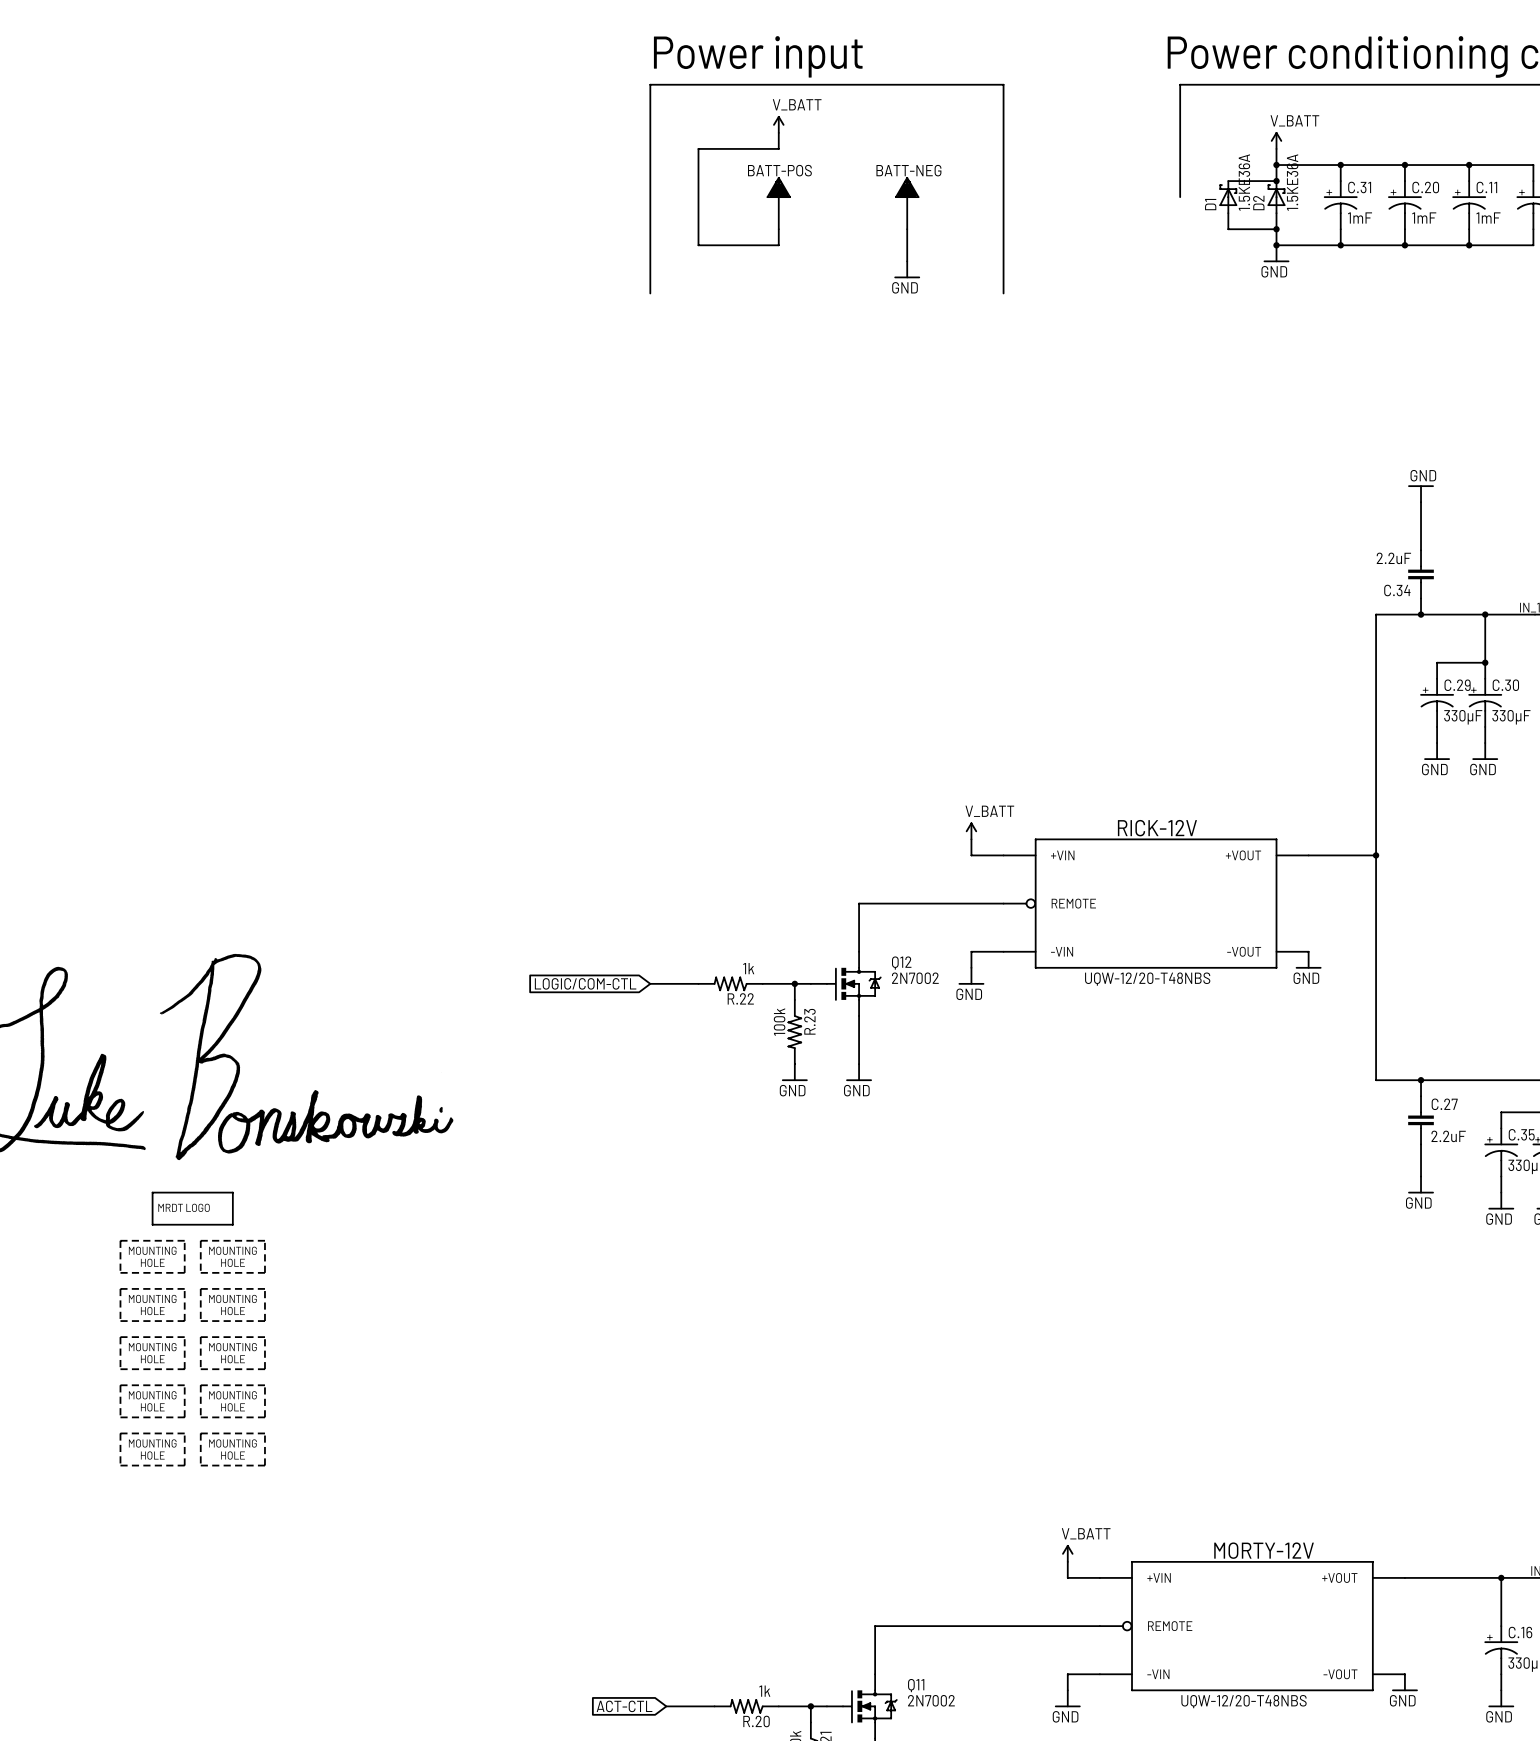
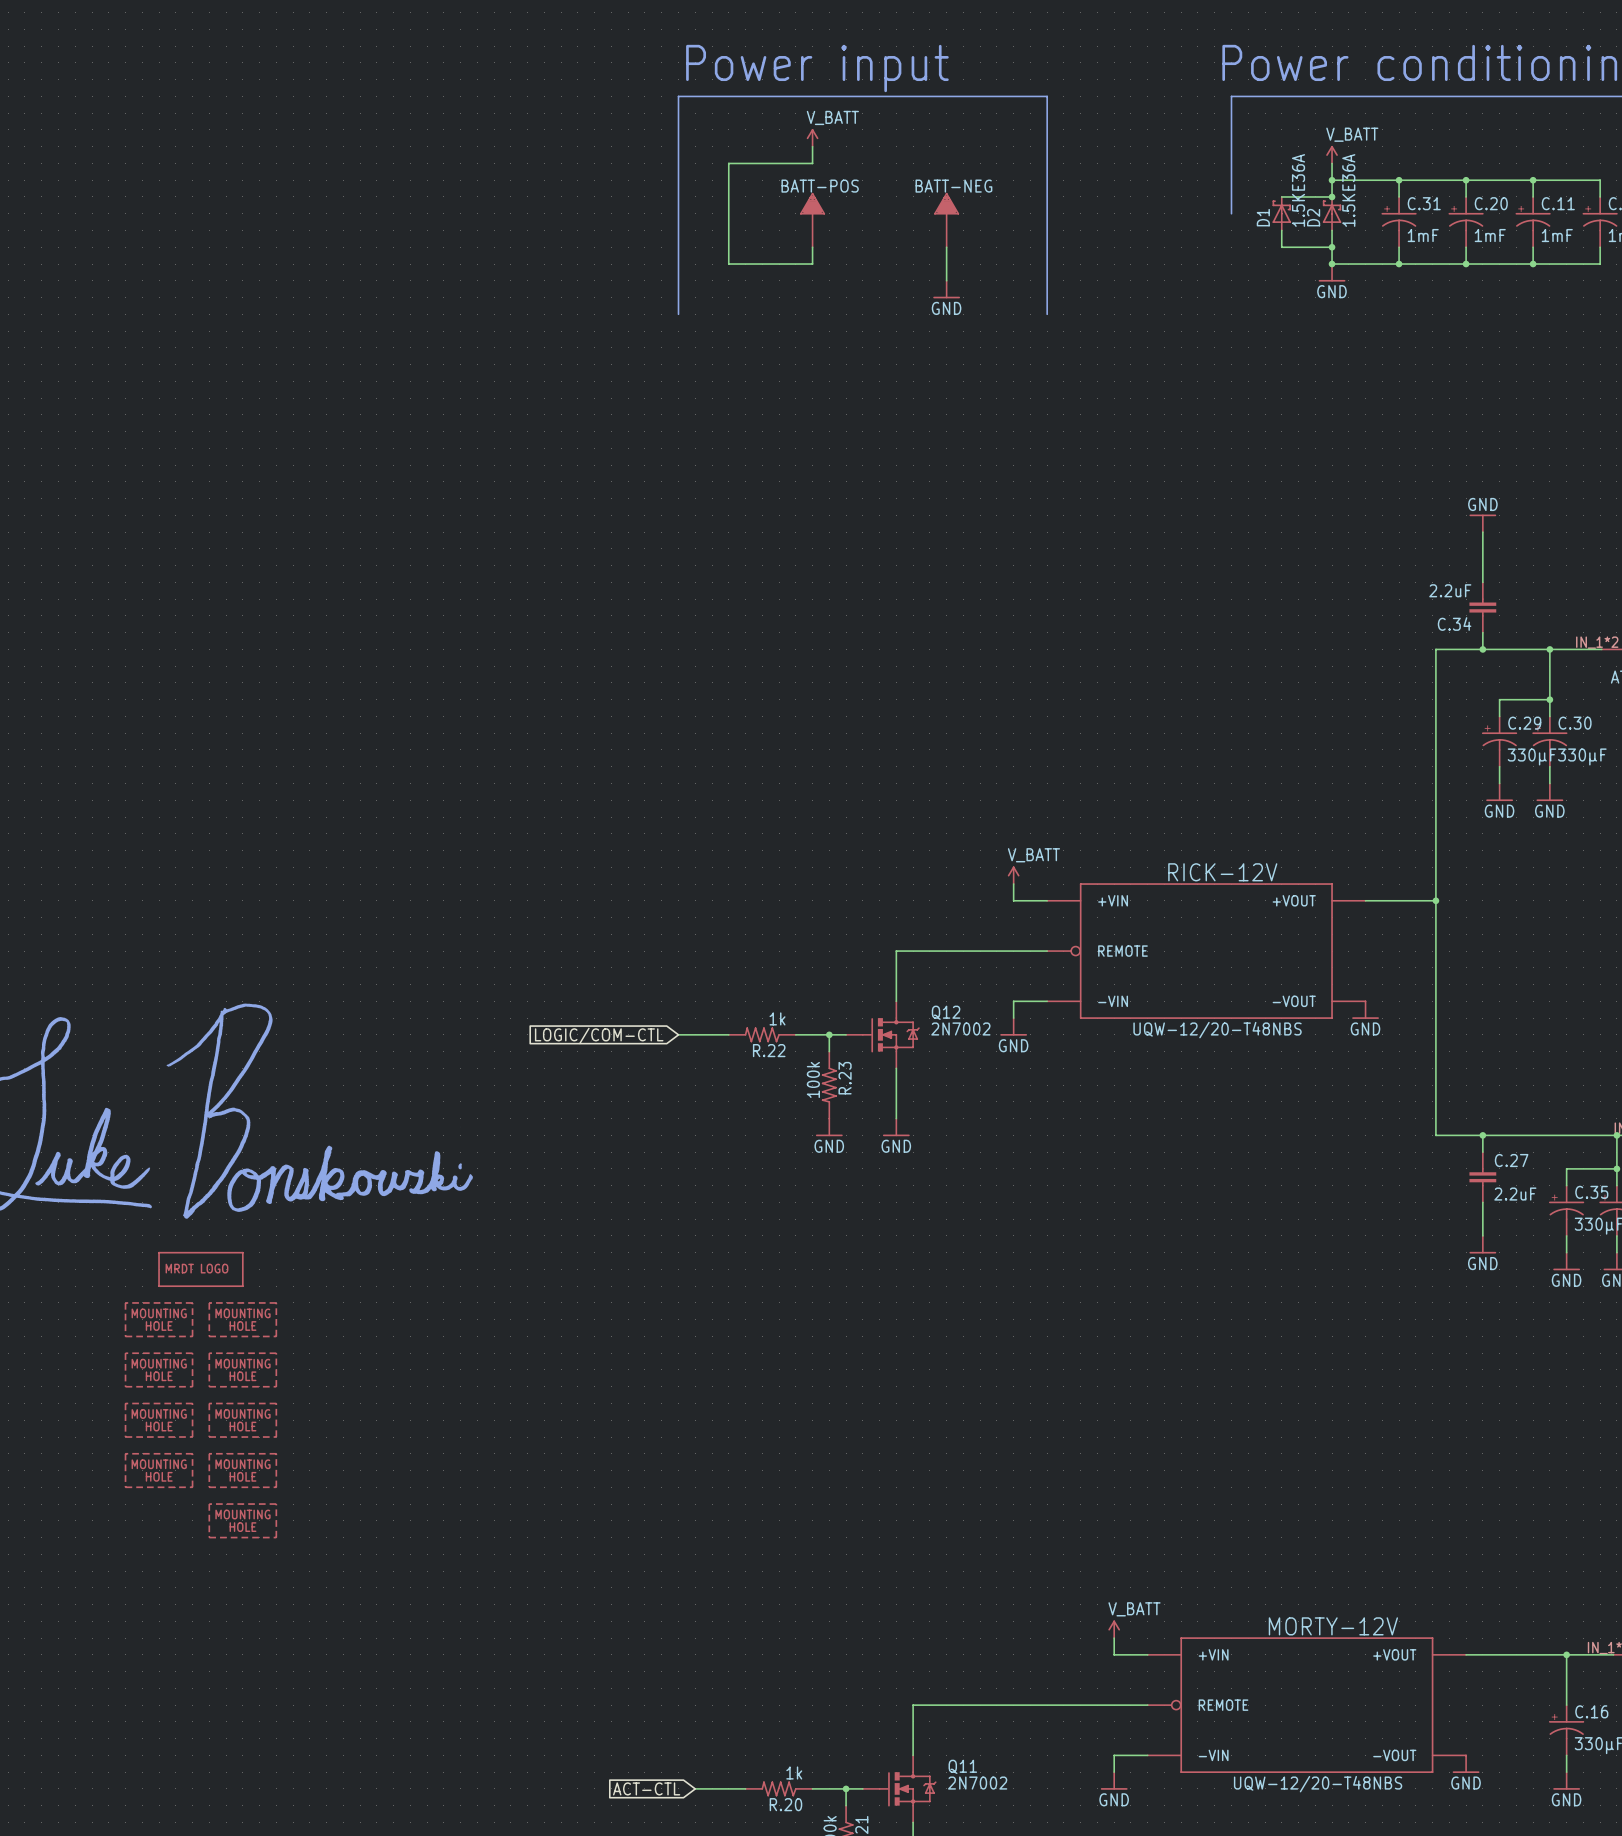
part: (152, 1449) -> none

